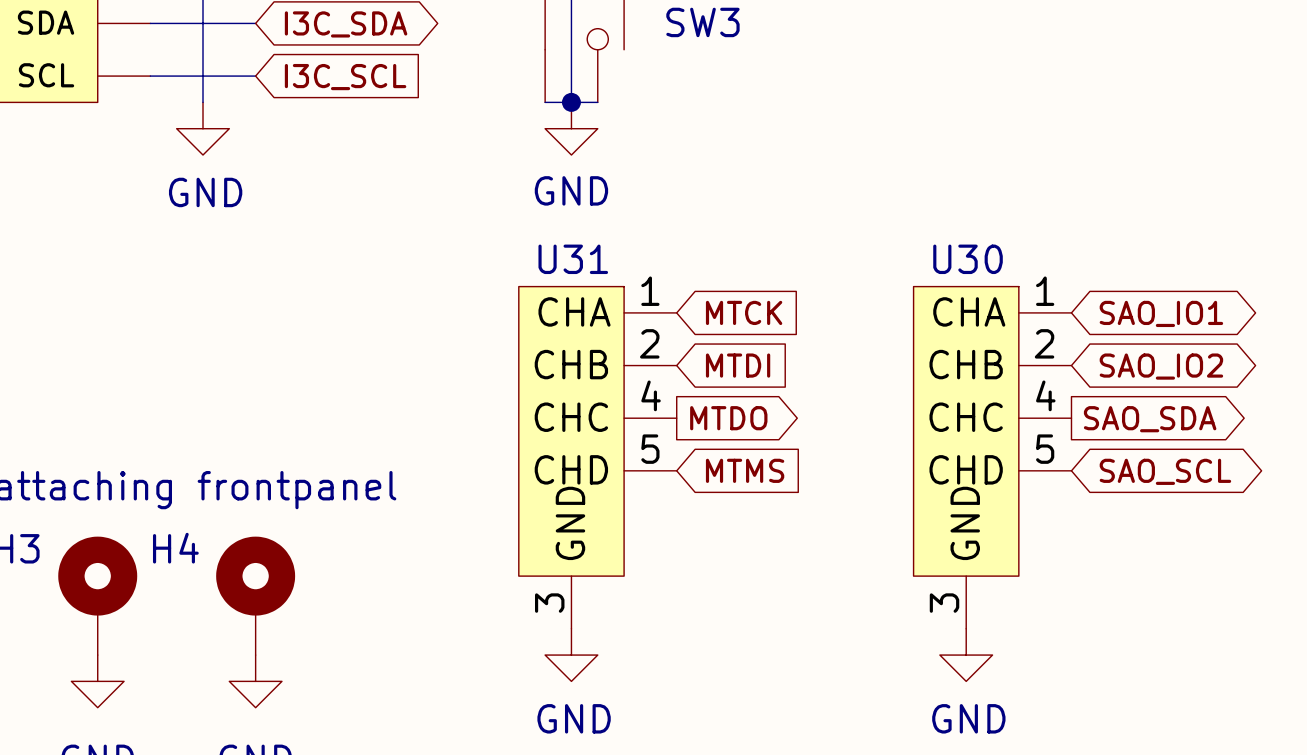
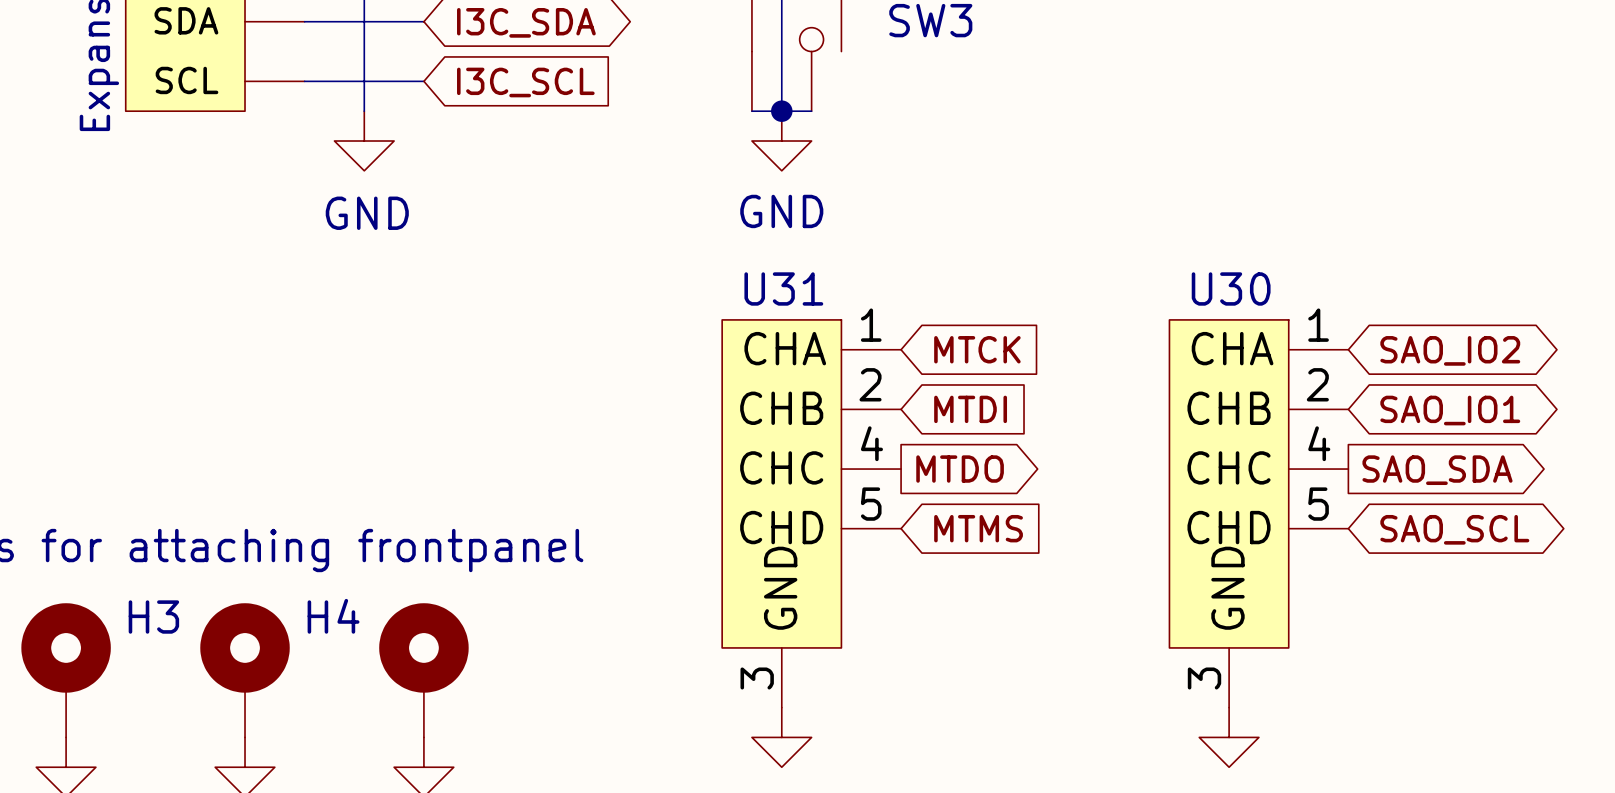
global label: SAO_IO1 (1161, 313) -> SAO_IO2 (1450, 350)
global label: SAO_IO2 (1161, 366) -> SAO_IO1 (1450, 410)

